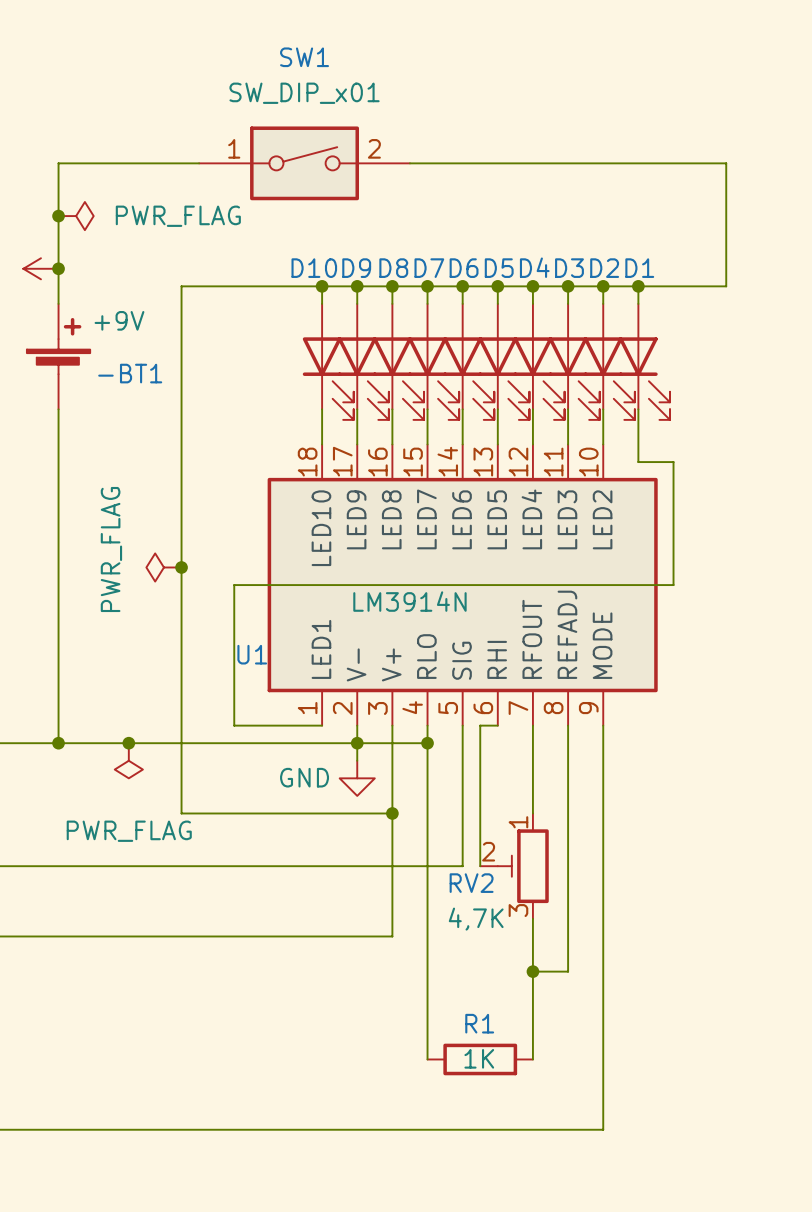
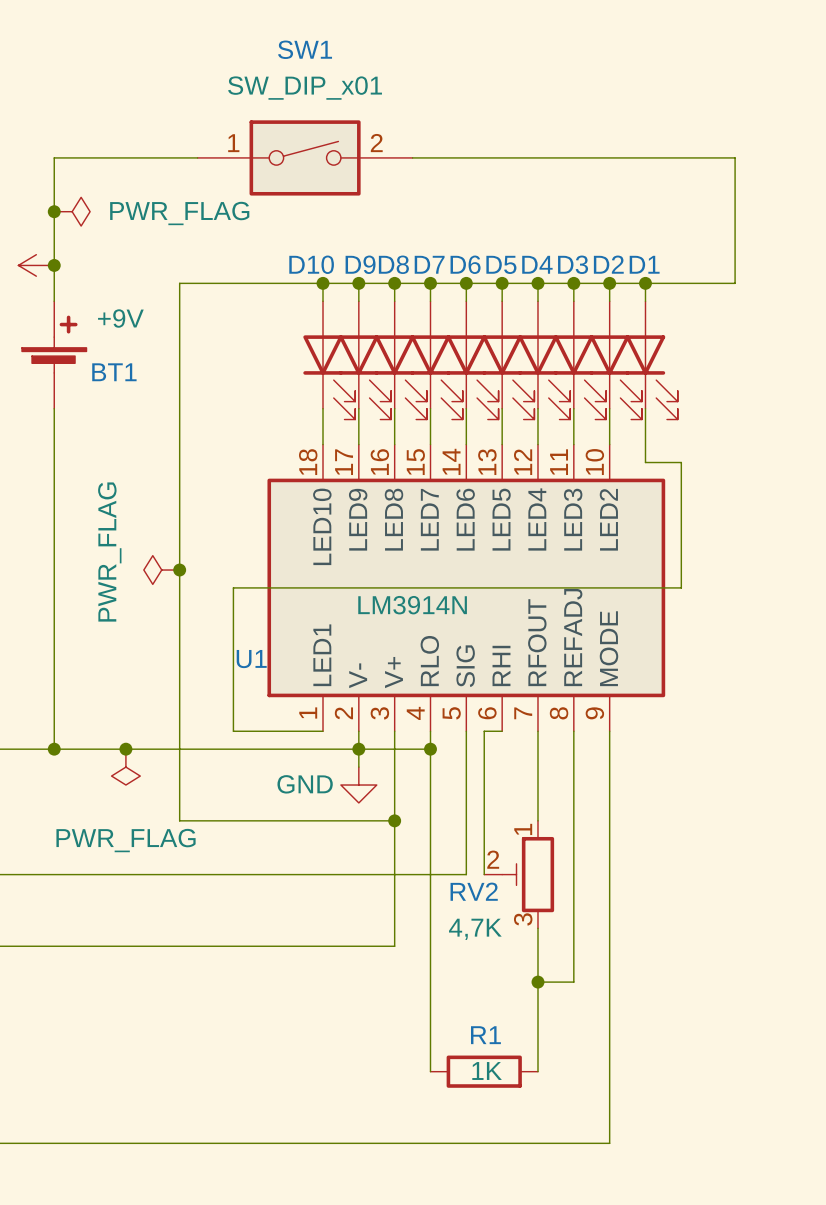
-BT1 name: -BT1 (130, 373) -> BT1 (114, 372)

